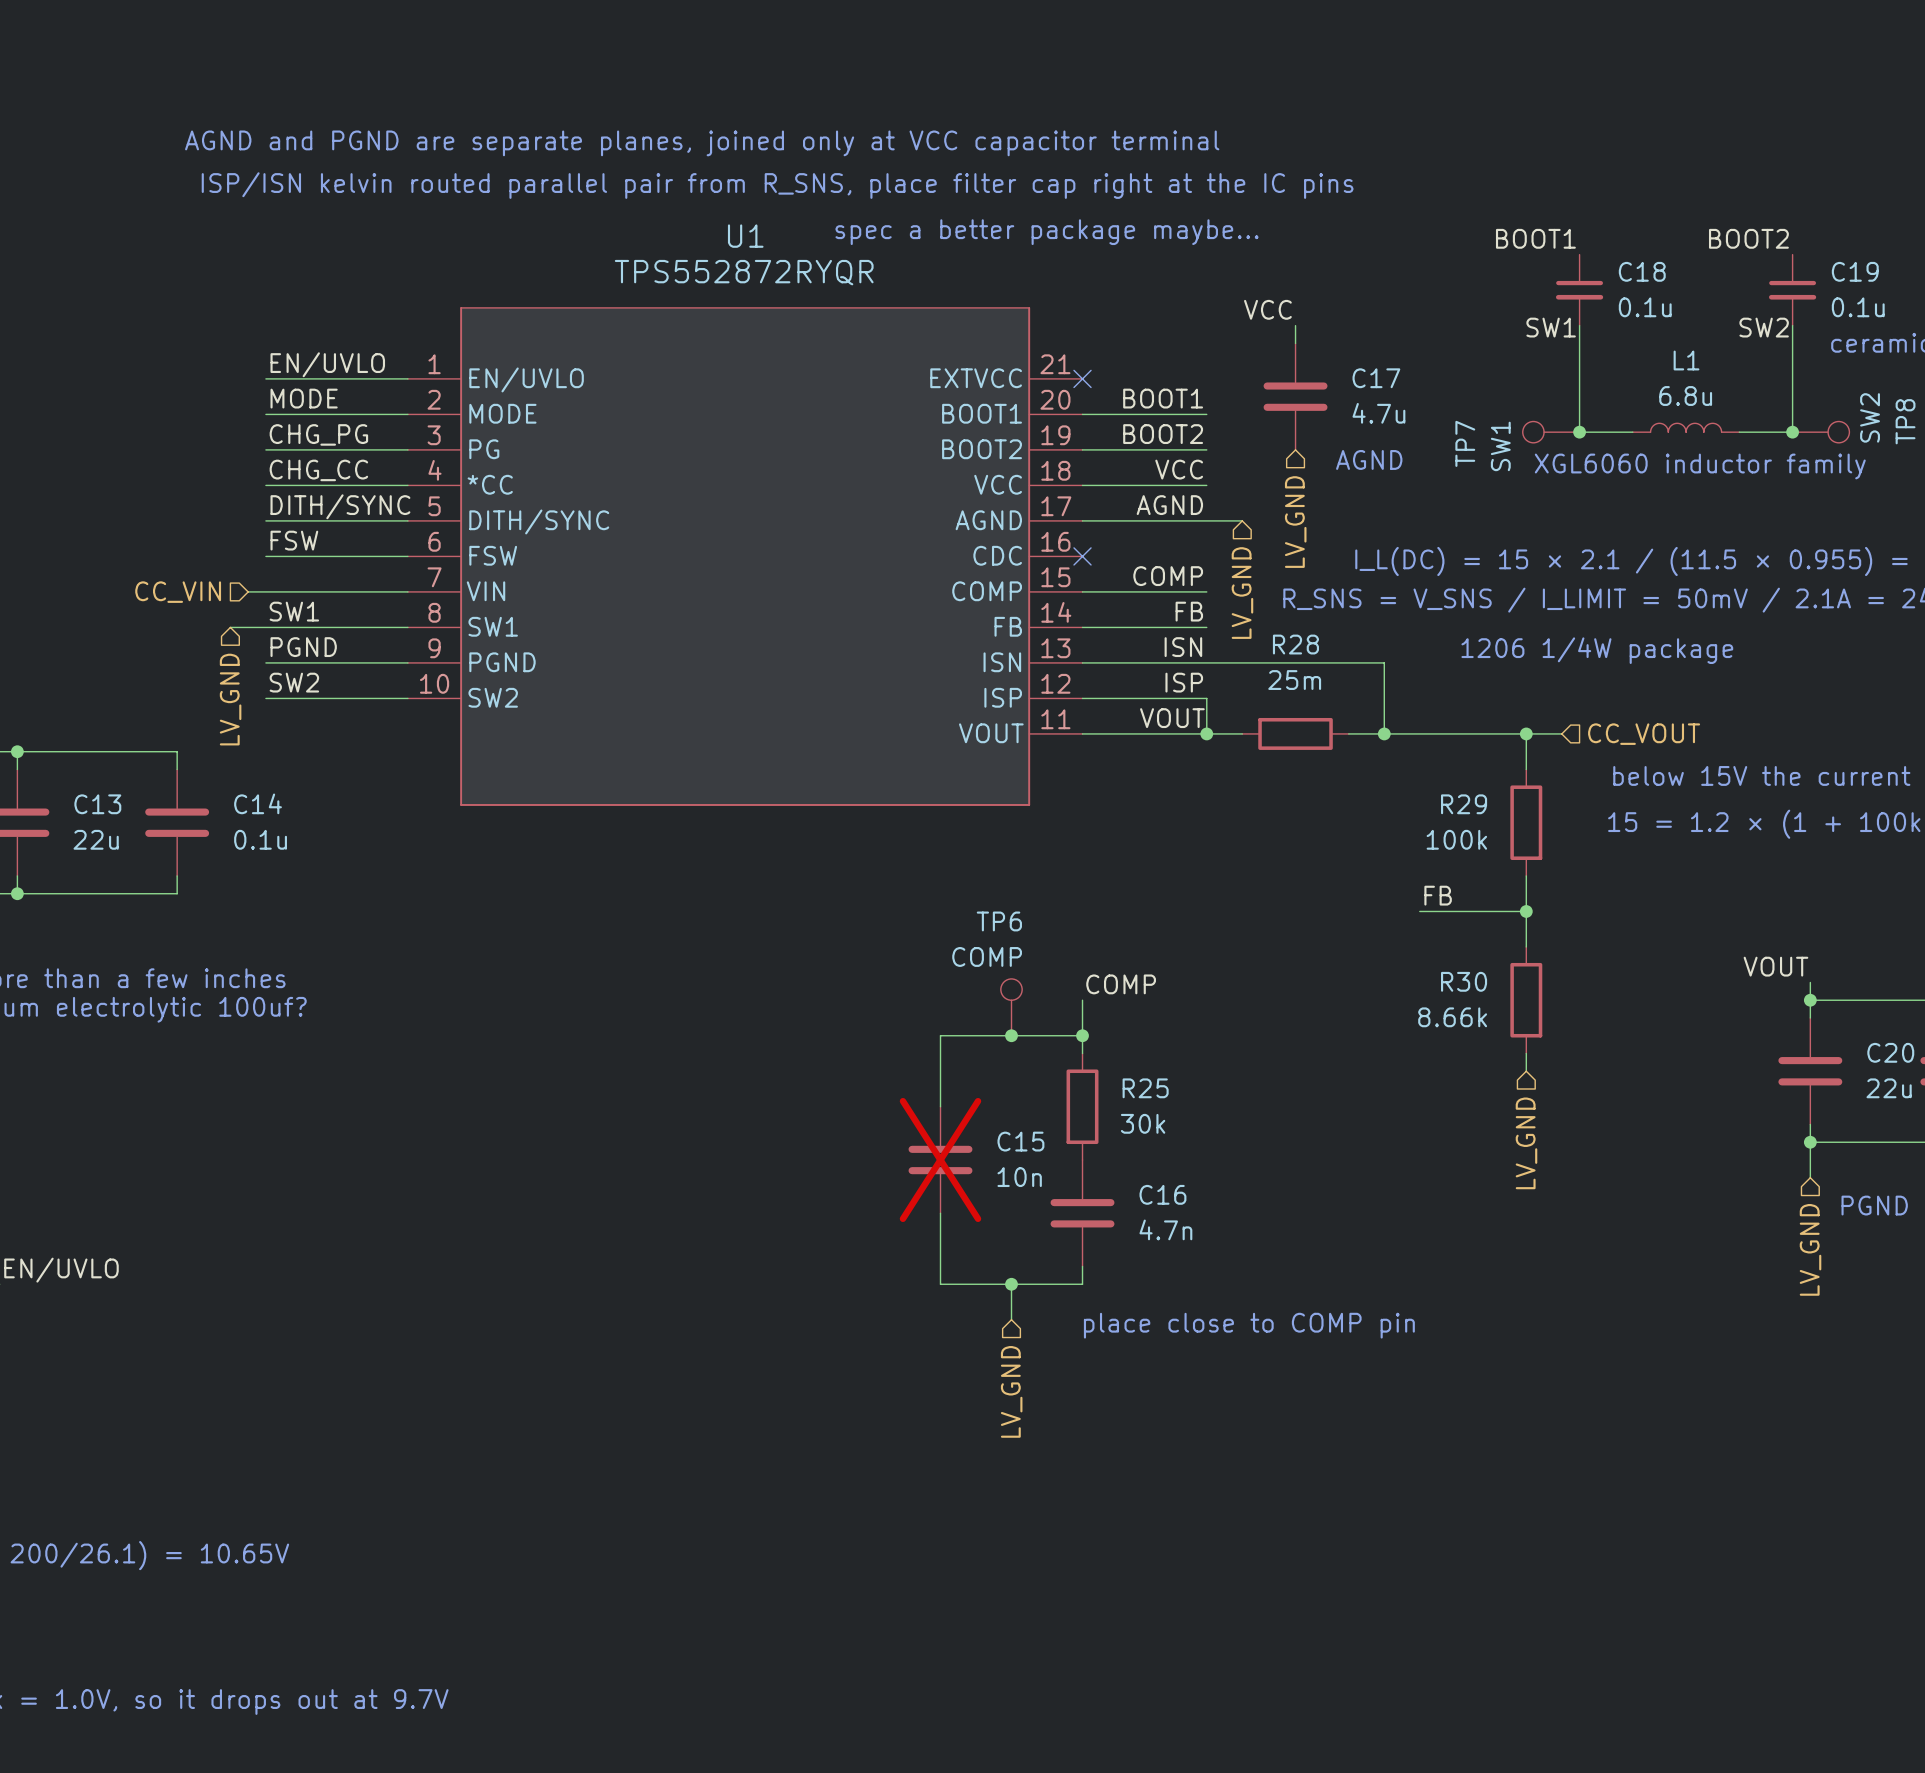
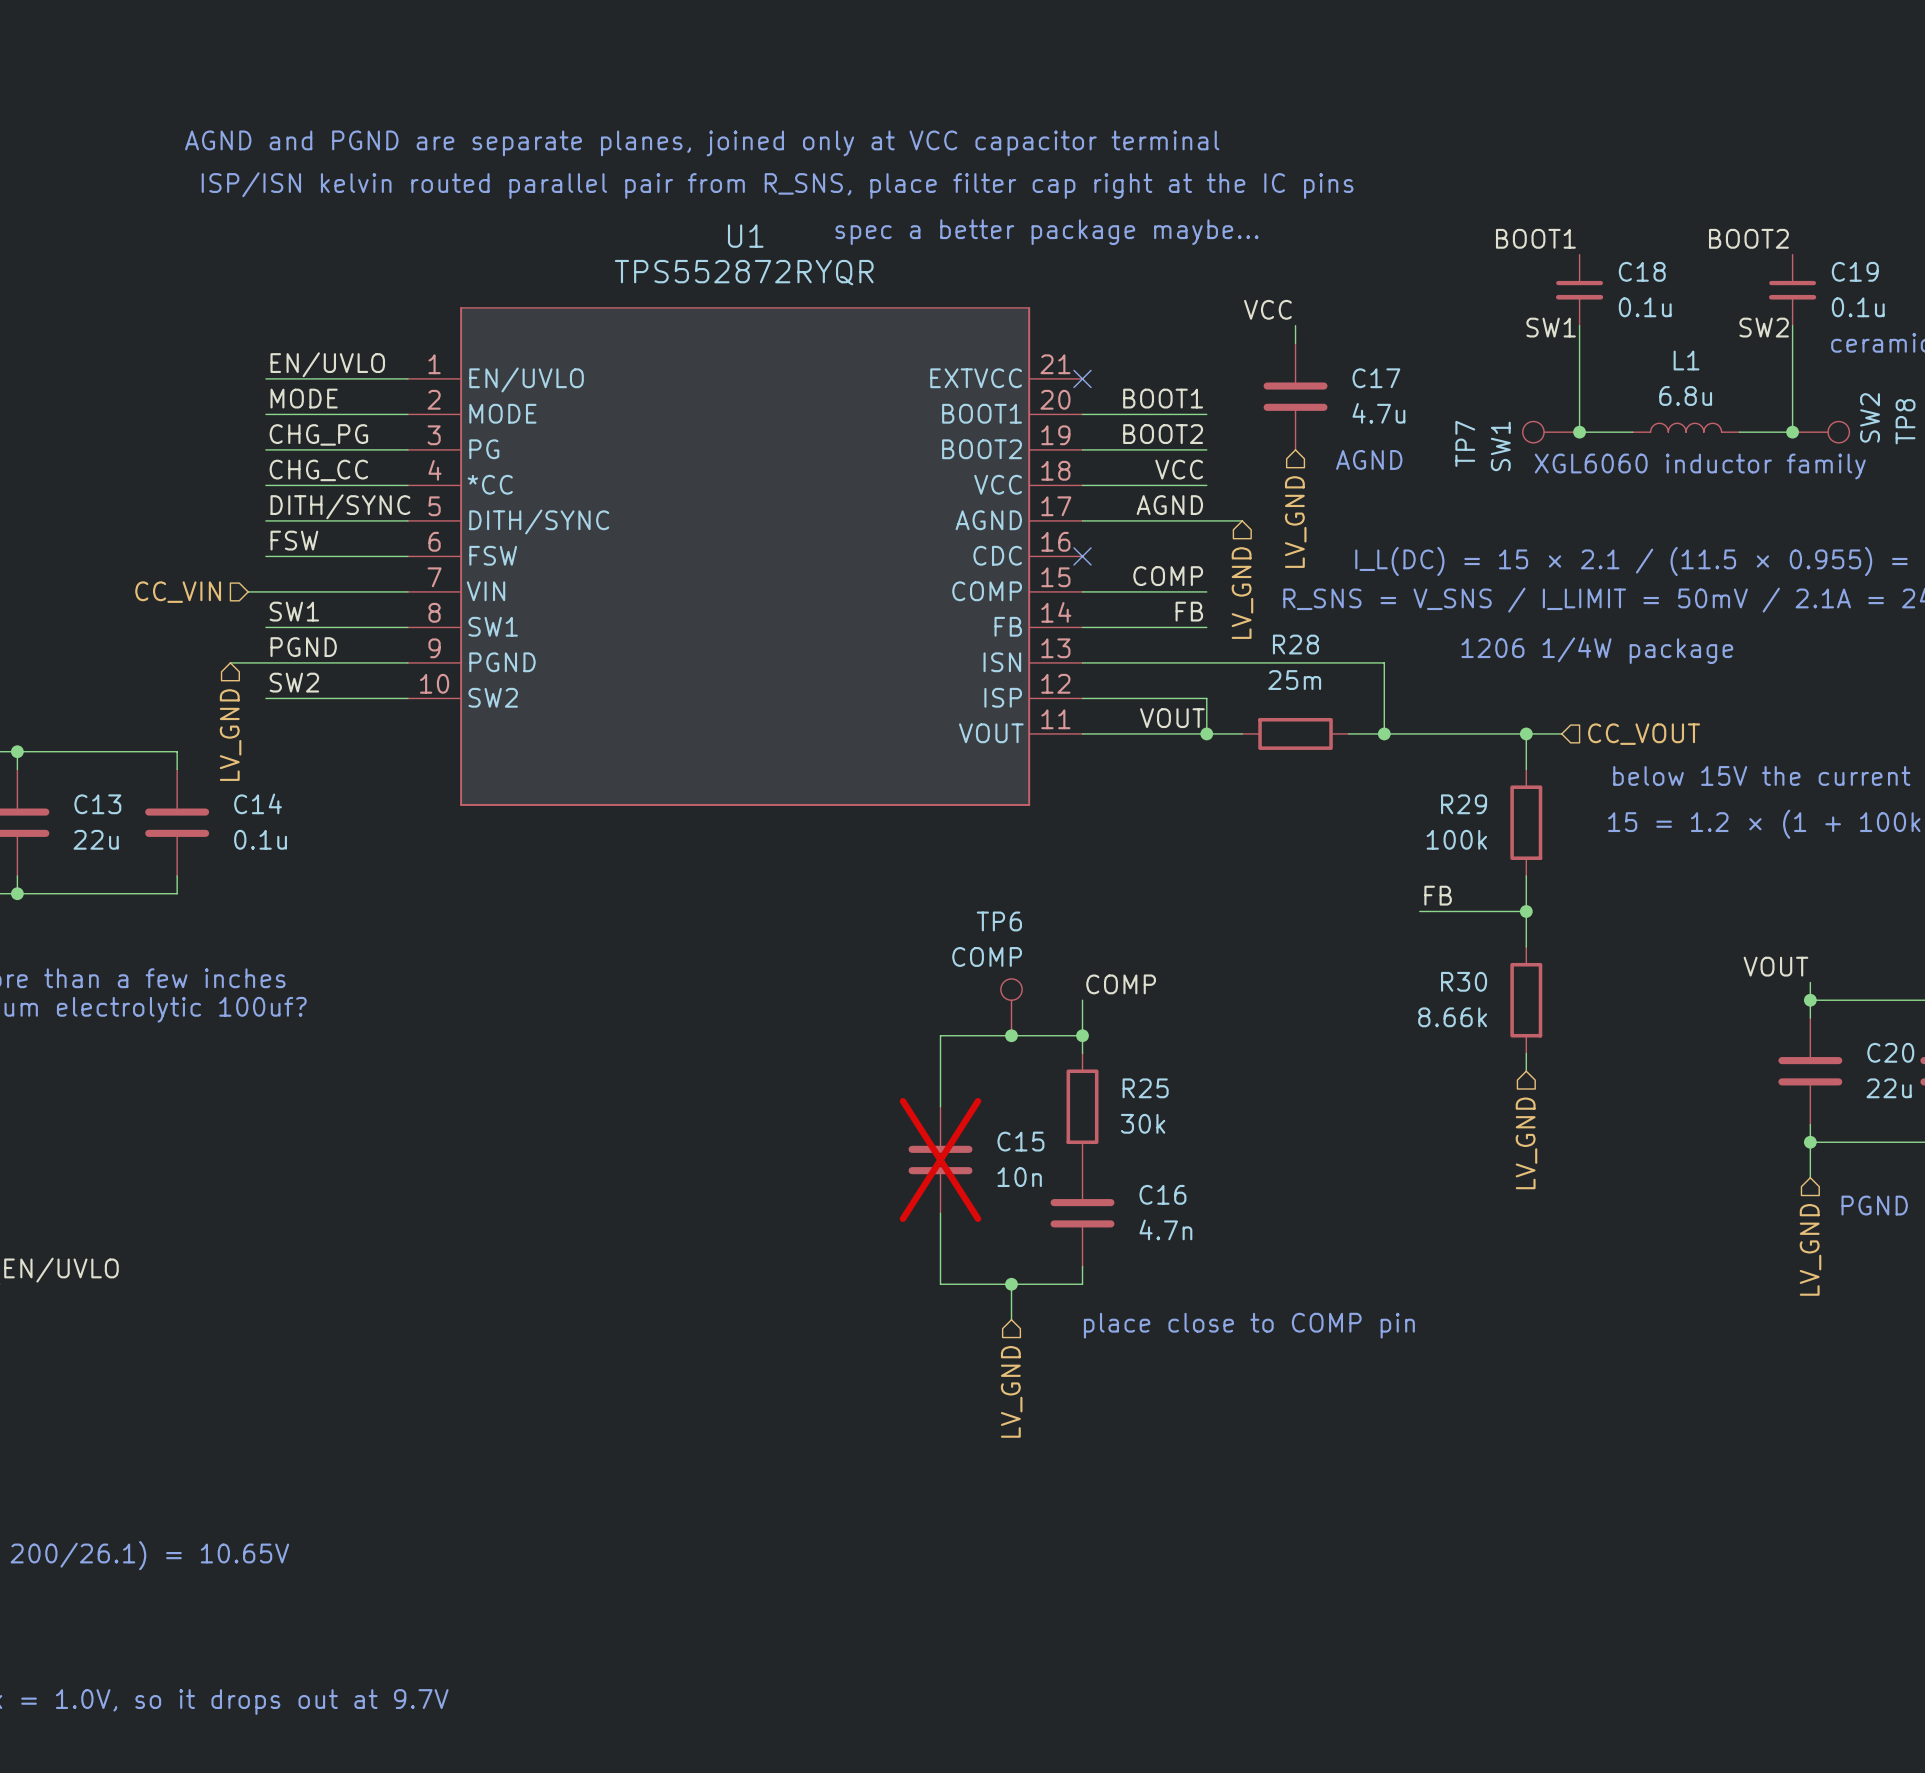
wire: (230, 627) (265, 627) -> (230, 662) (265, 662)
label: ISN (1183, 647) -> none
label: ISP (1184, 682) -> none
hierarchical label position: LV_GND (230, 699) -> LV_GND (230, 735)

